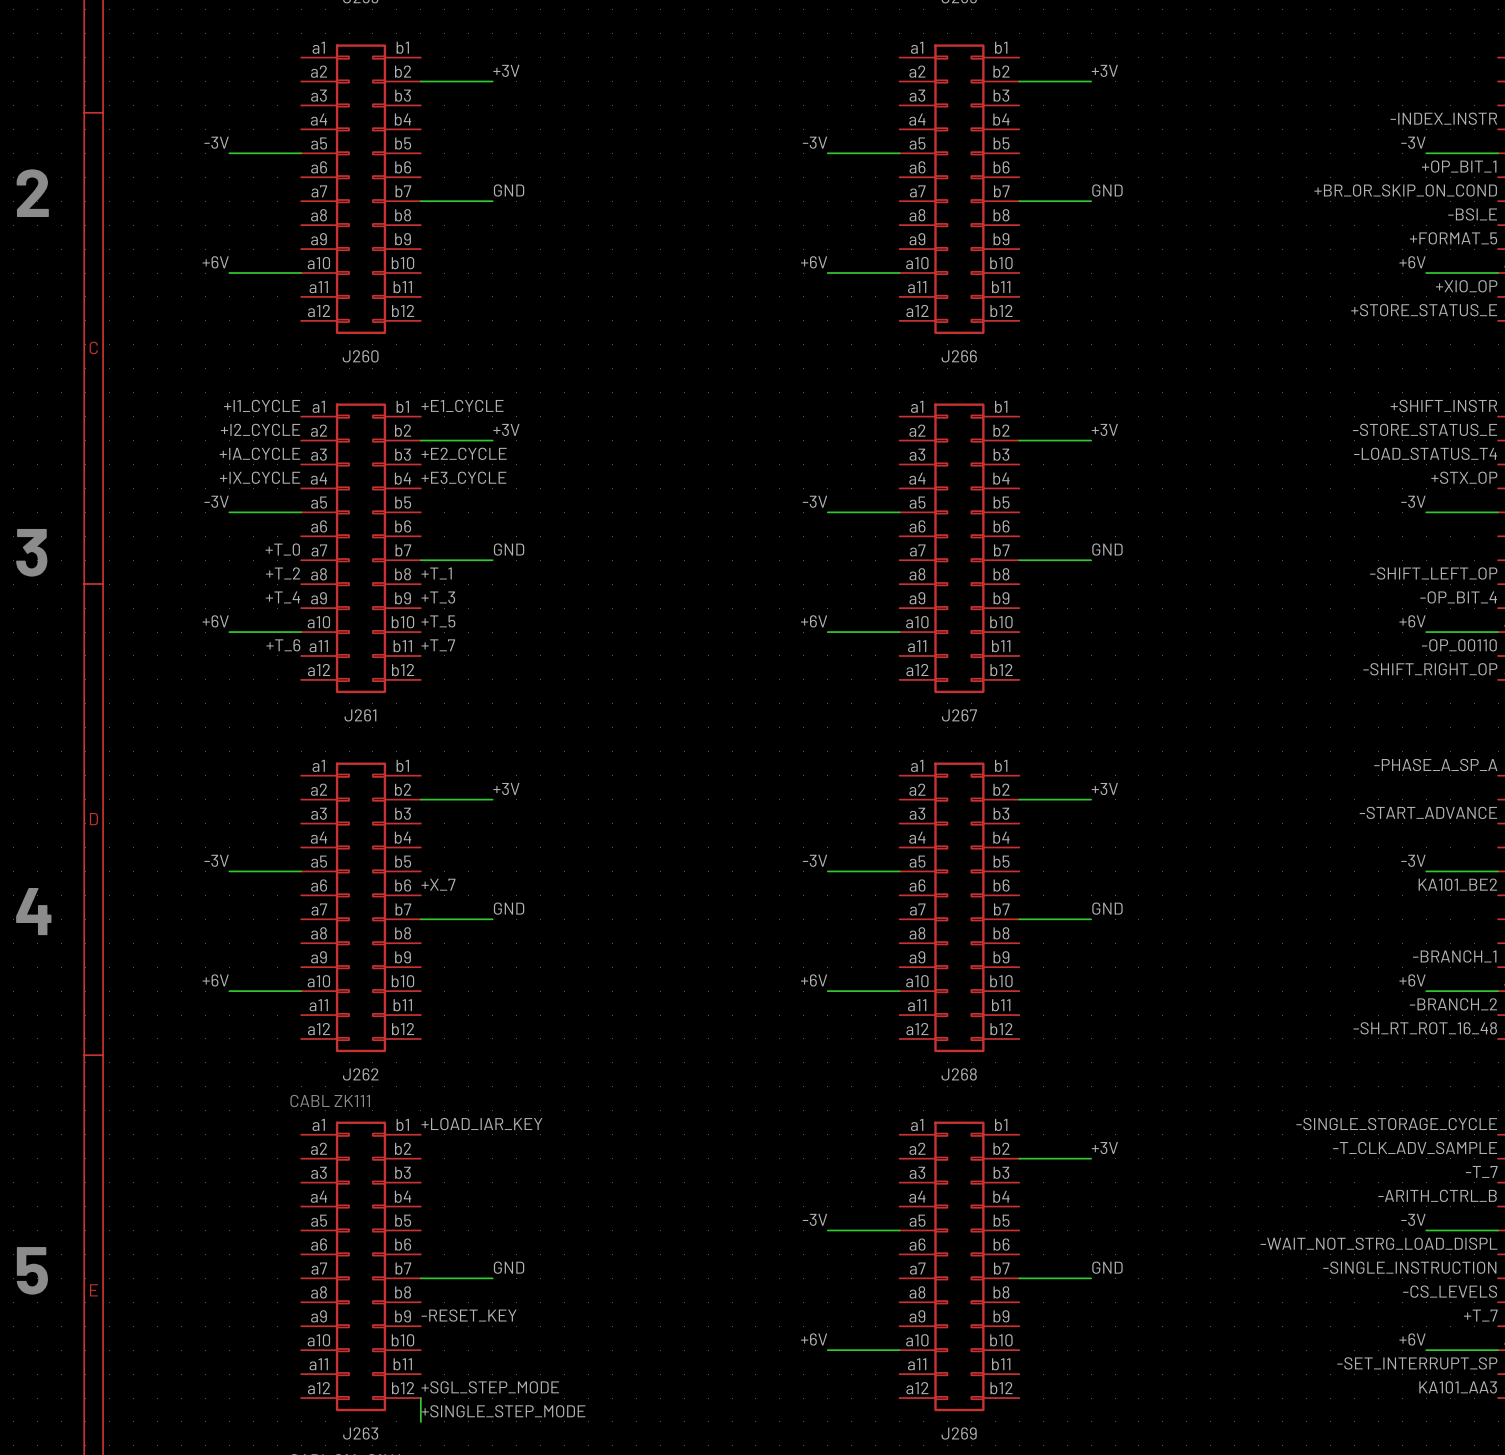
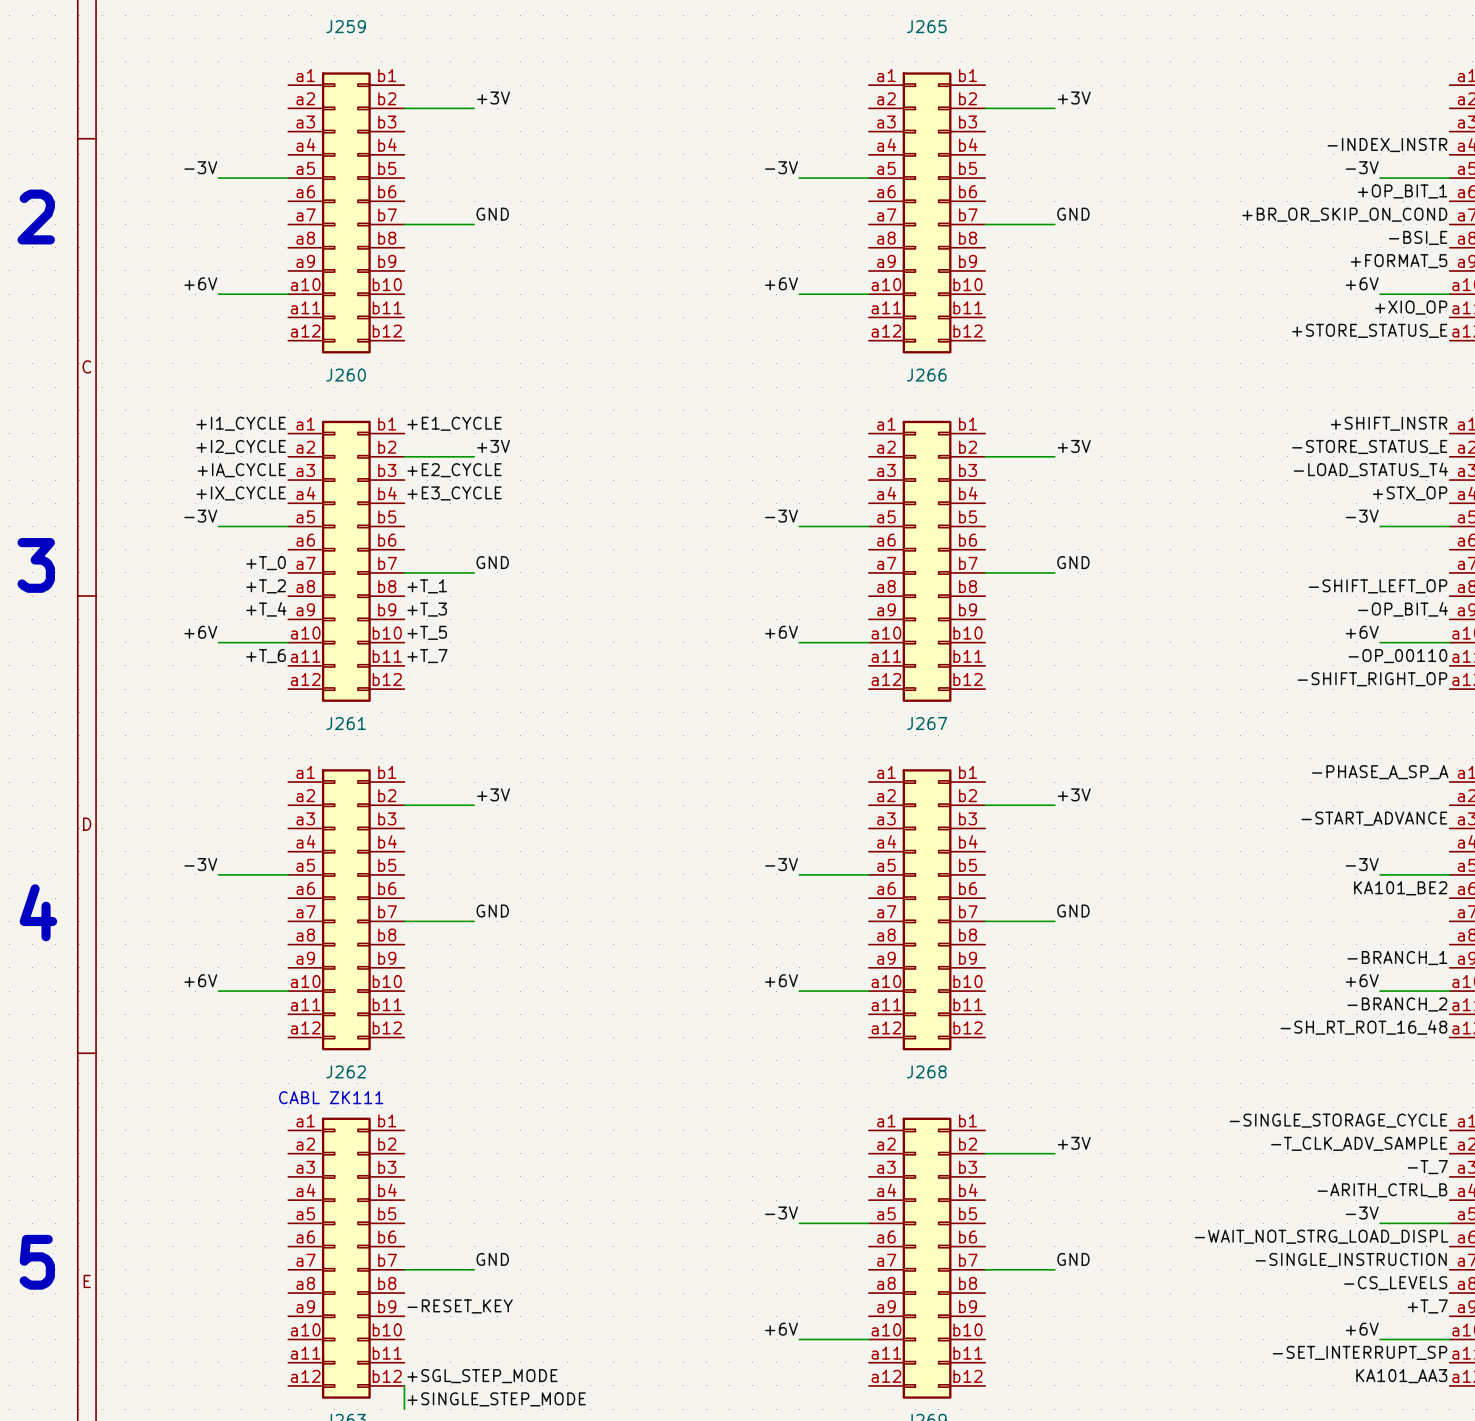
label: +X_7 (438, 884) -> none
label: +LOAD_IAR_KEY (481, 1124) -> none

